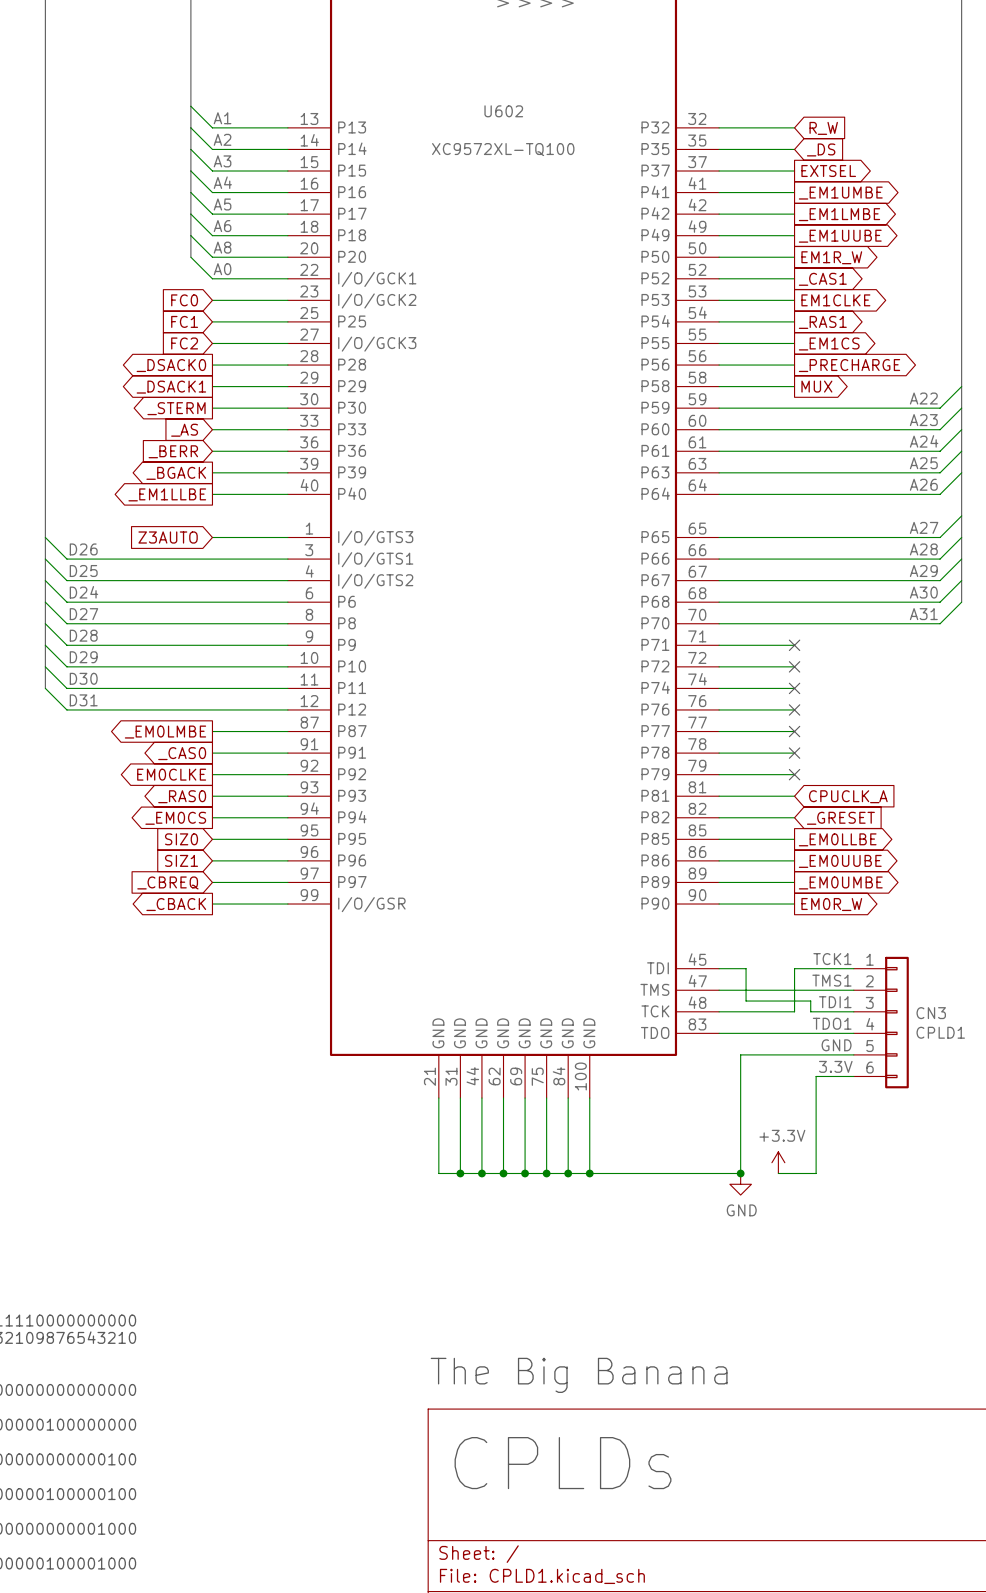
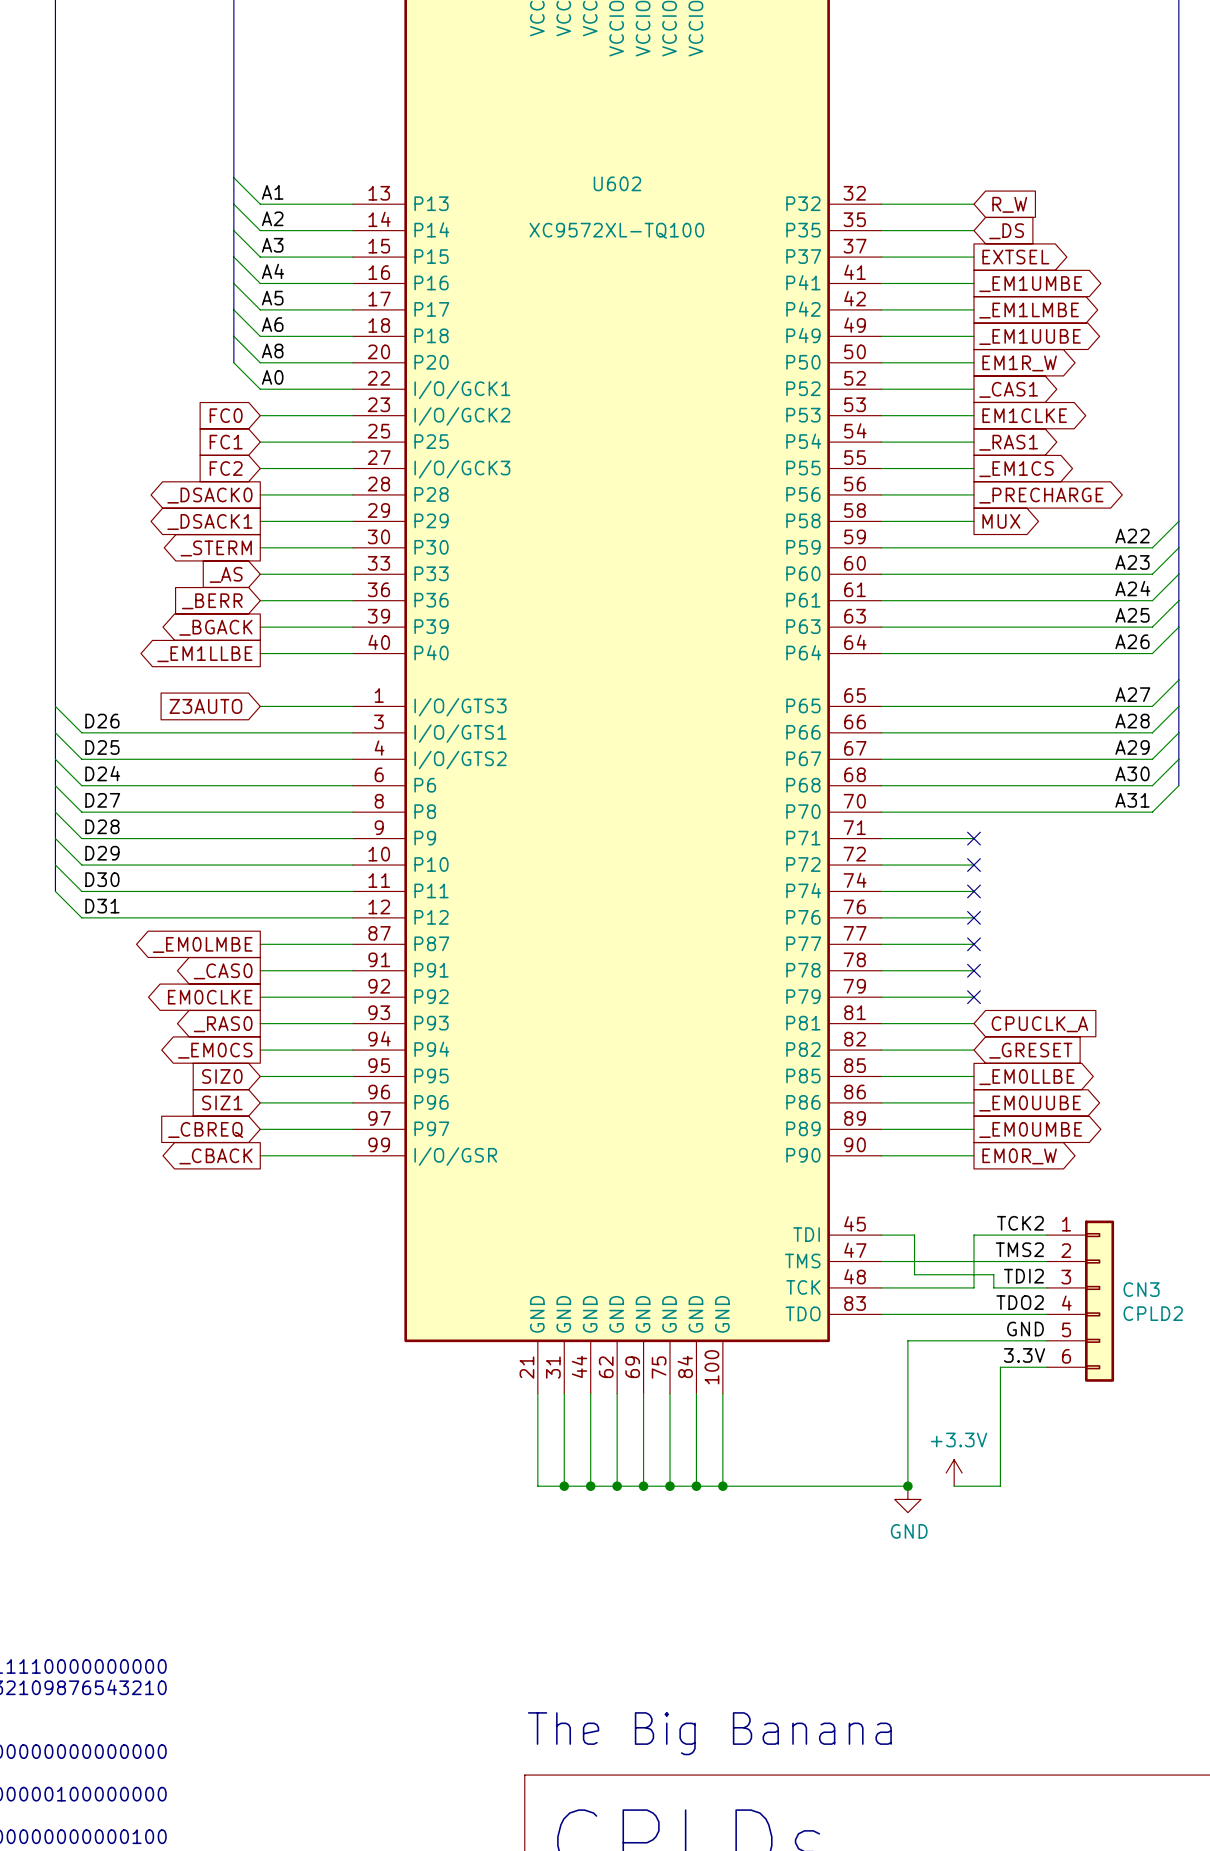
label: TCK1 (832, 959) -> TCK2 (1020, 1223)
label: TMS1 (831, 980) -> TMS2 (1019, 1249)
label: TDI1 (835, 1002) -> TDI2 (1023, 1276)
label: TDO1 (832, 1023) -> TDO2 (1020, 1302)
CN3 value: CPLD1 (940, 1032) -> CPLD2 (1153, 1313)

